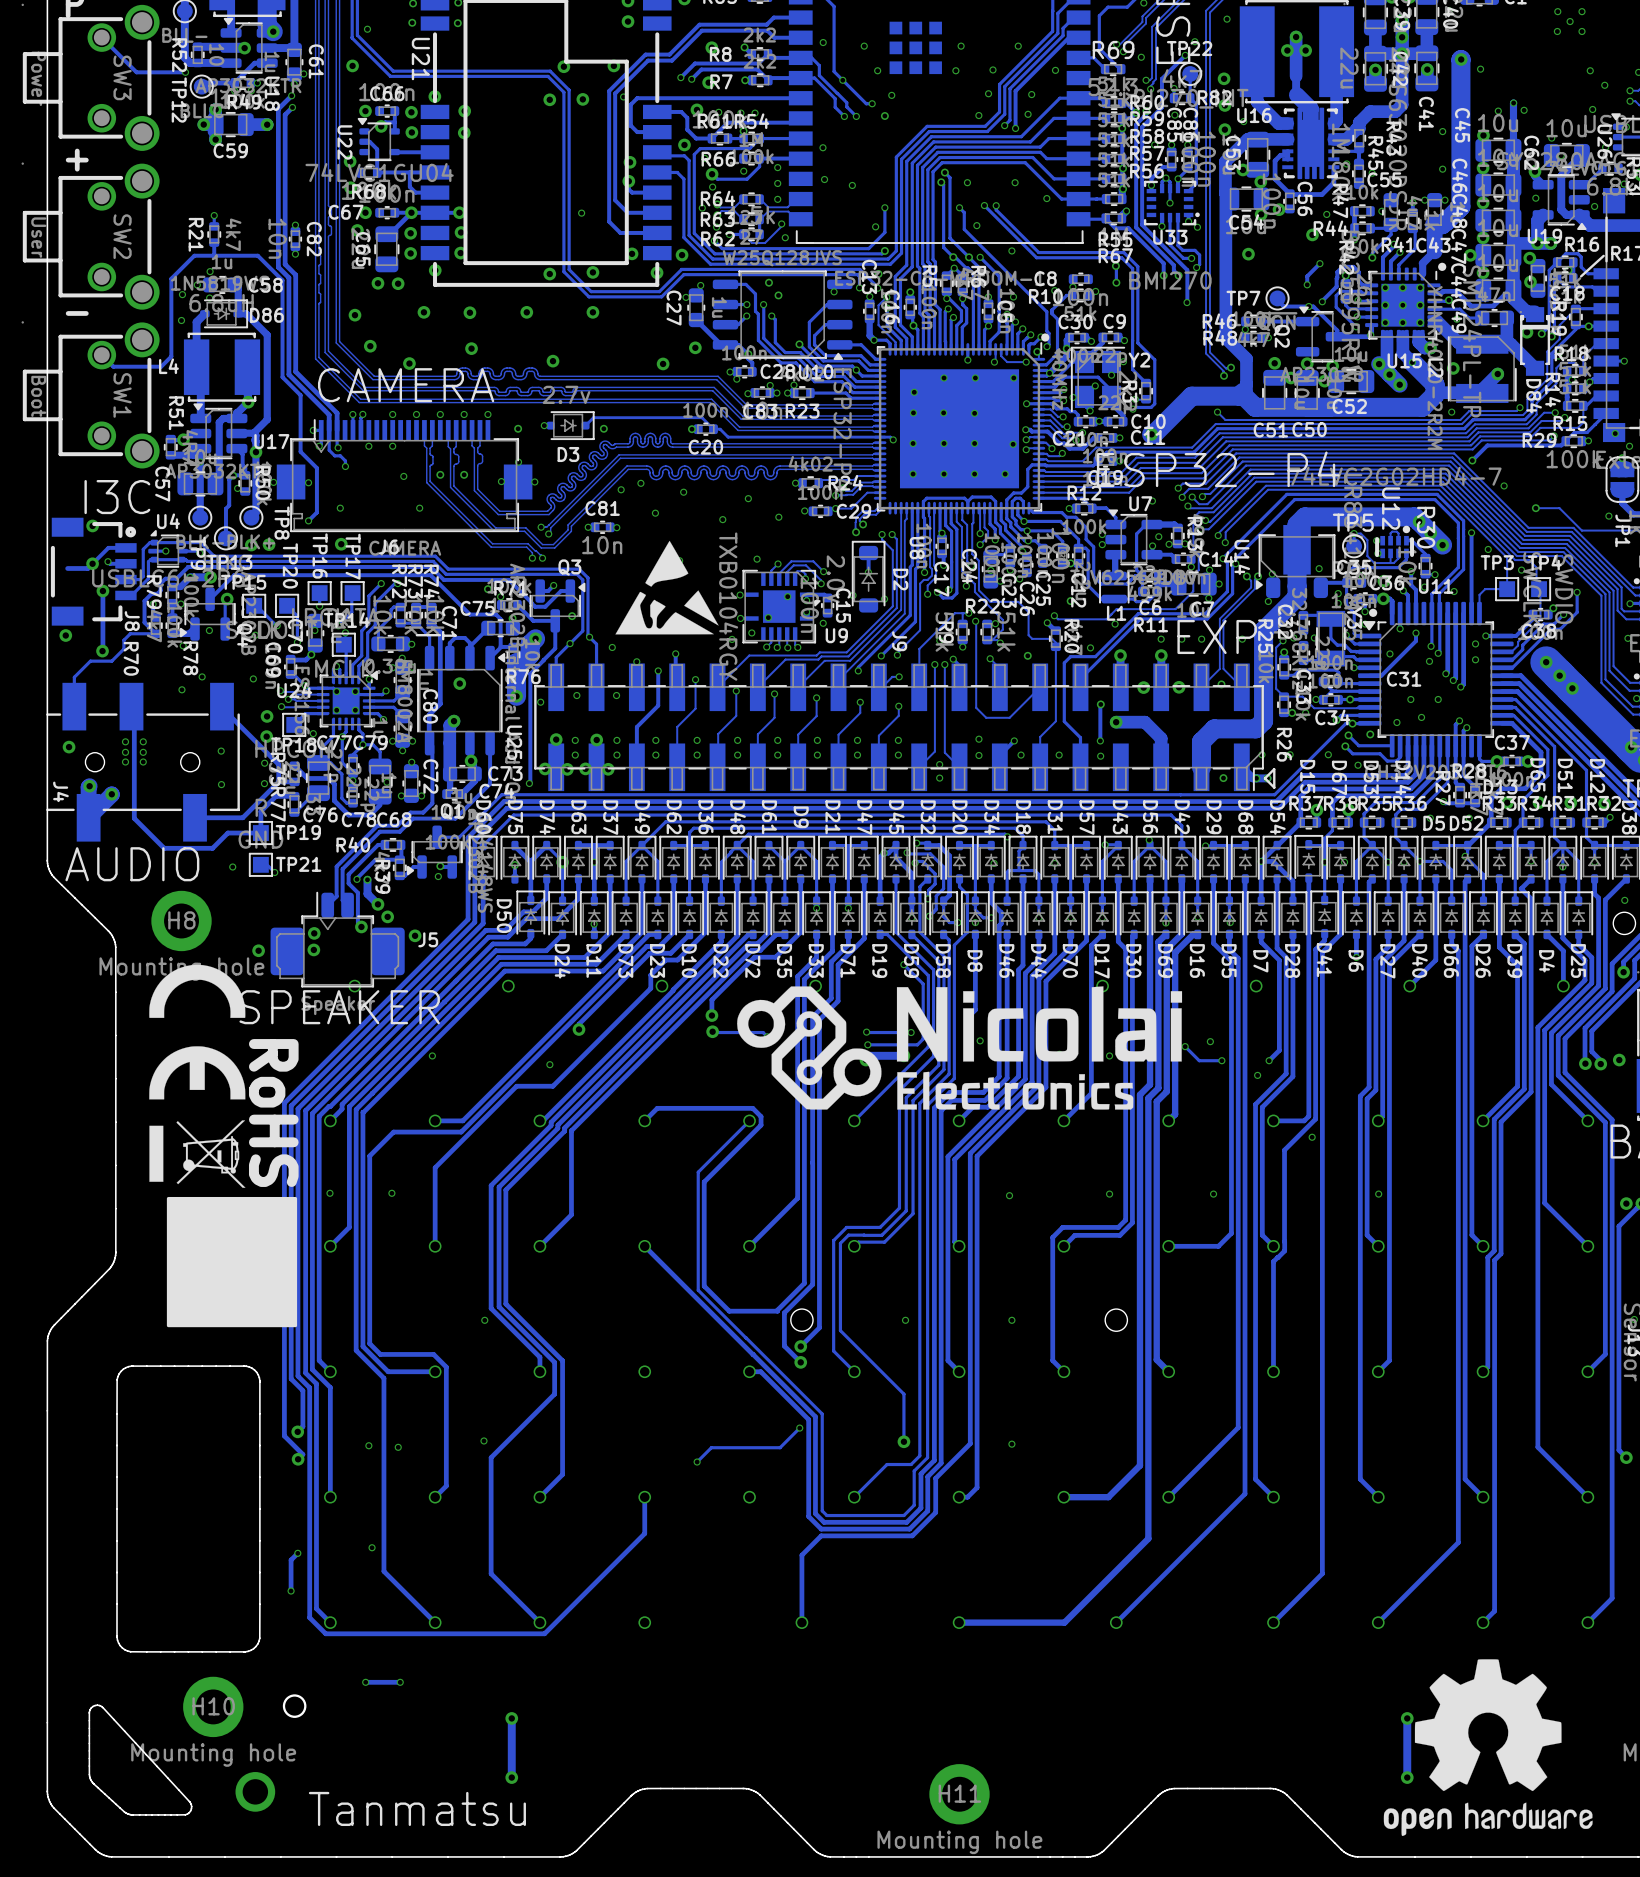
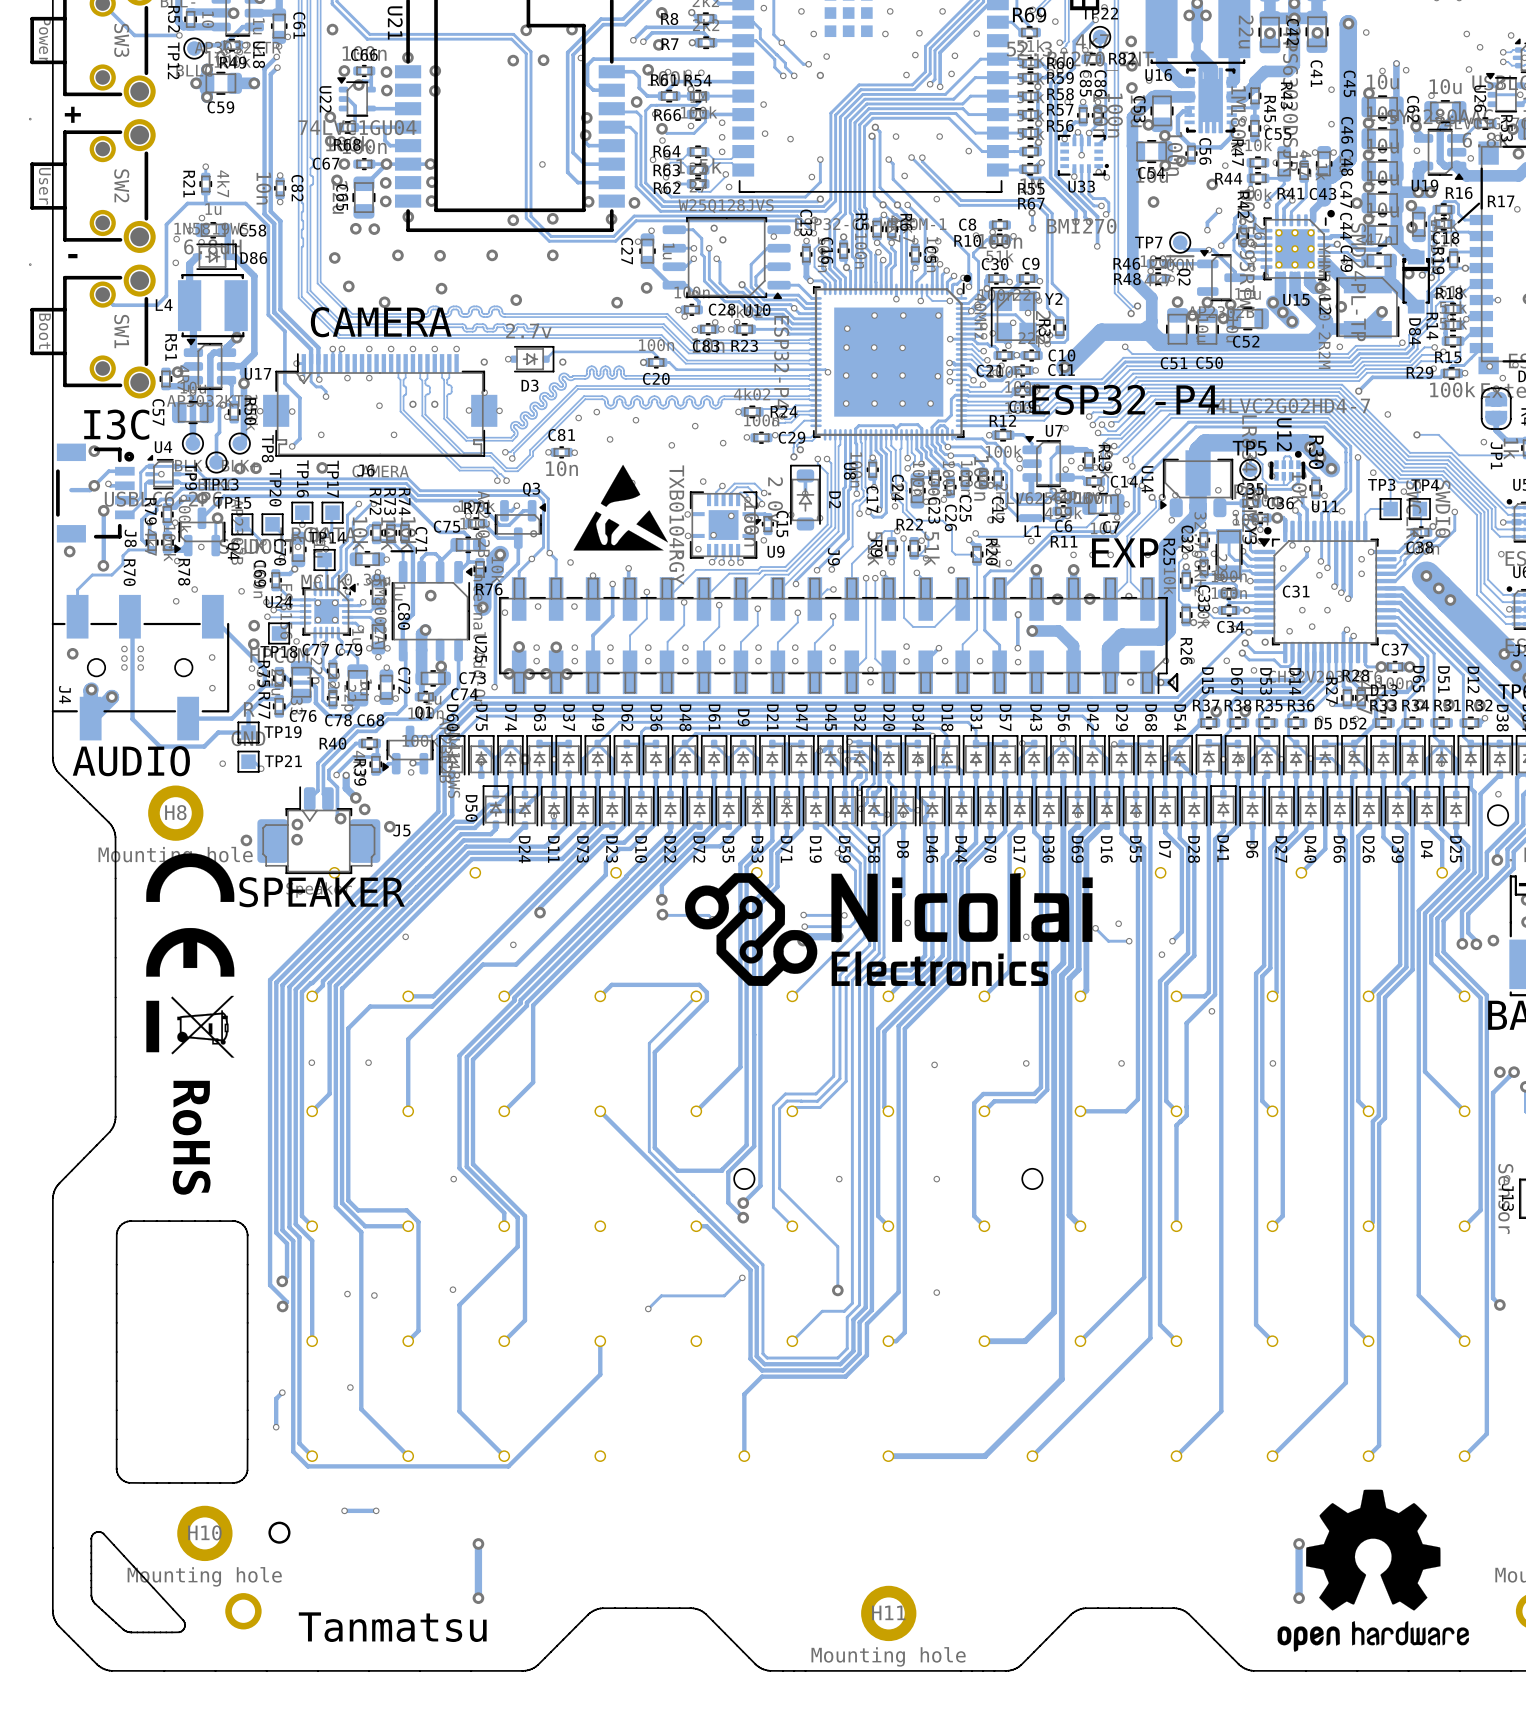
text position: RoHS (273, 1113) -> RoHS (191, 1137)
drawing: [166, 1196, 298, 1328] -> none

